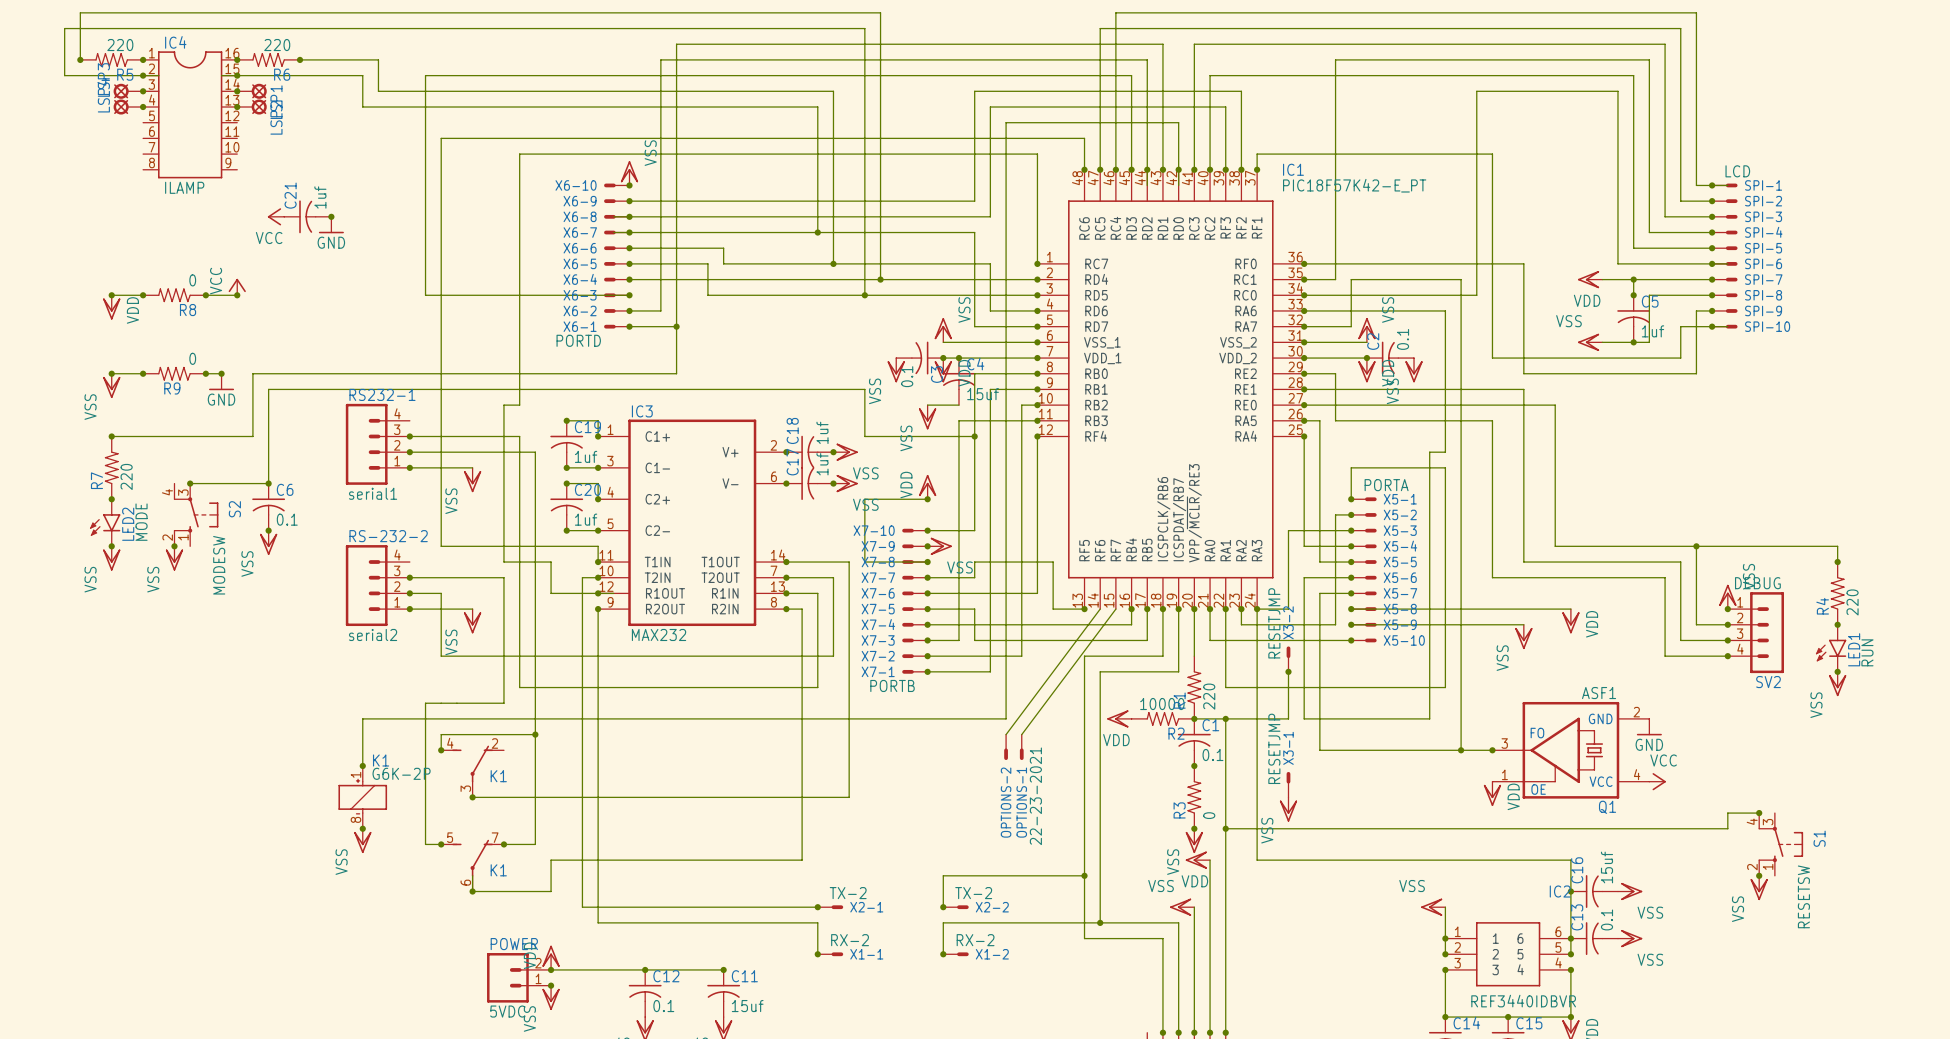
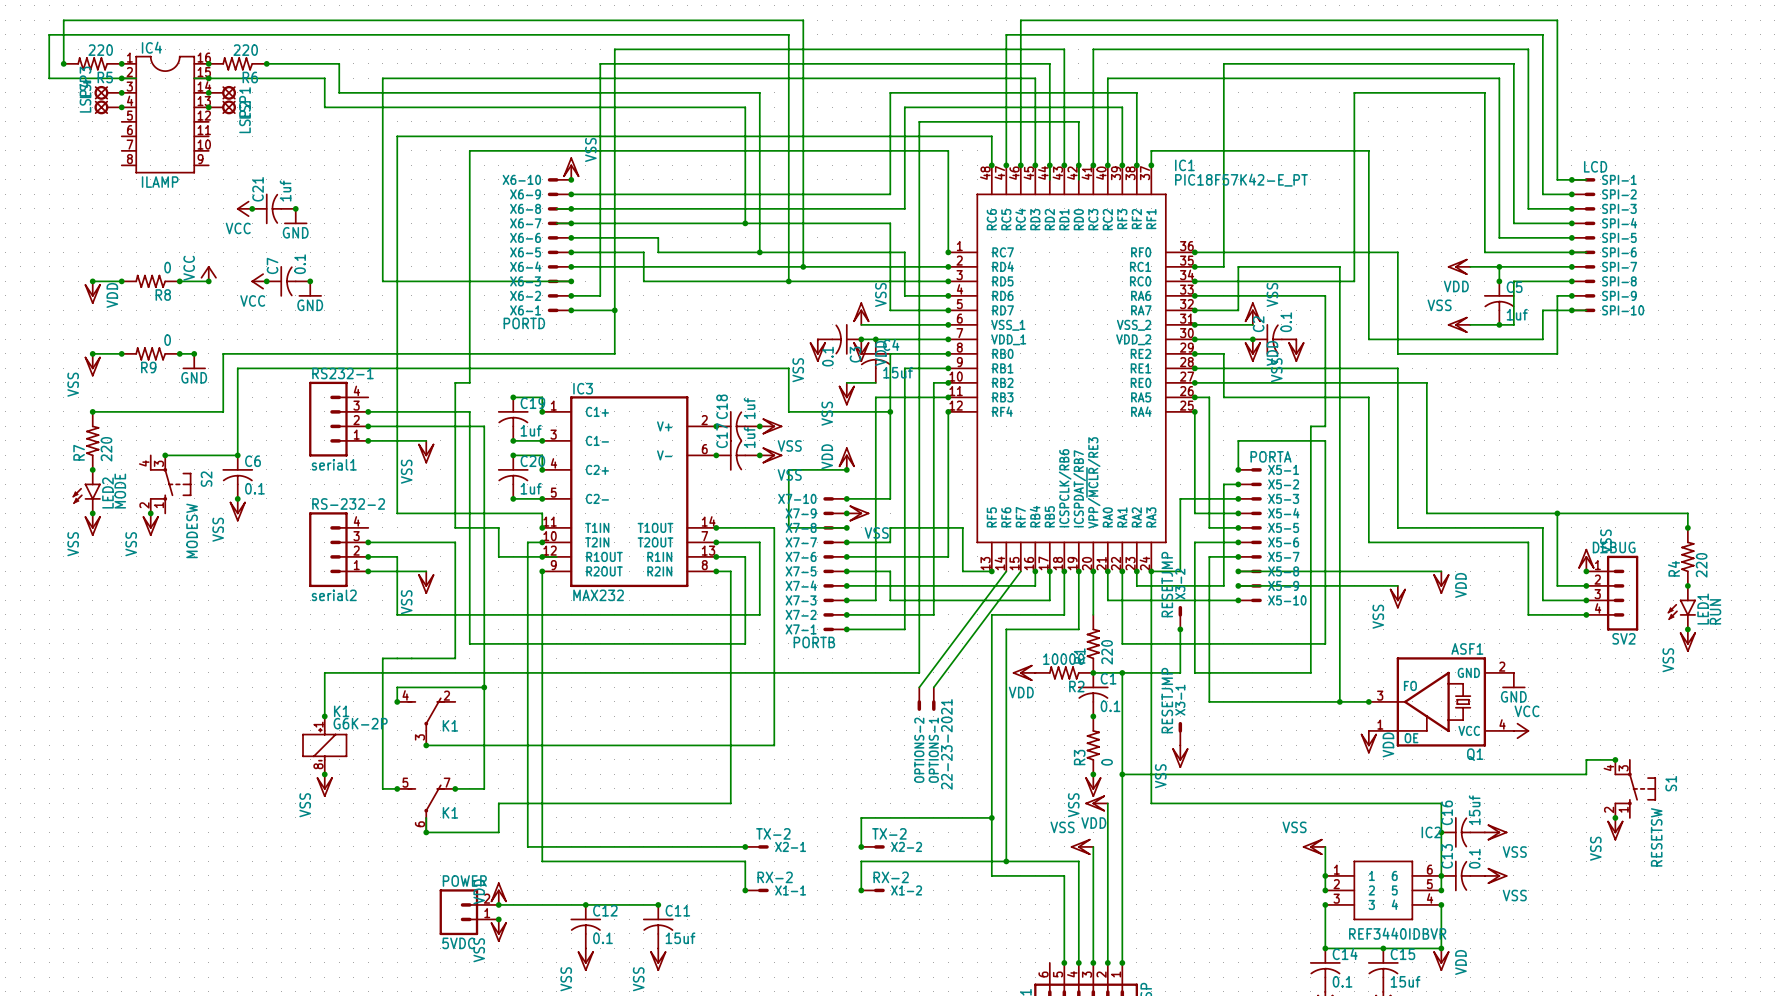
junction: none -> (252, 208)
power symbol: none -> VCC (259, 281)
junction: none -> (266, 281)
C7: none -> 0.1 (288, 281)
junction: none -> (310, 281)
power symbol: none -> GND (310, 289)

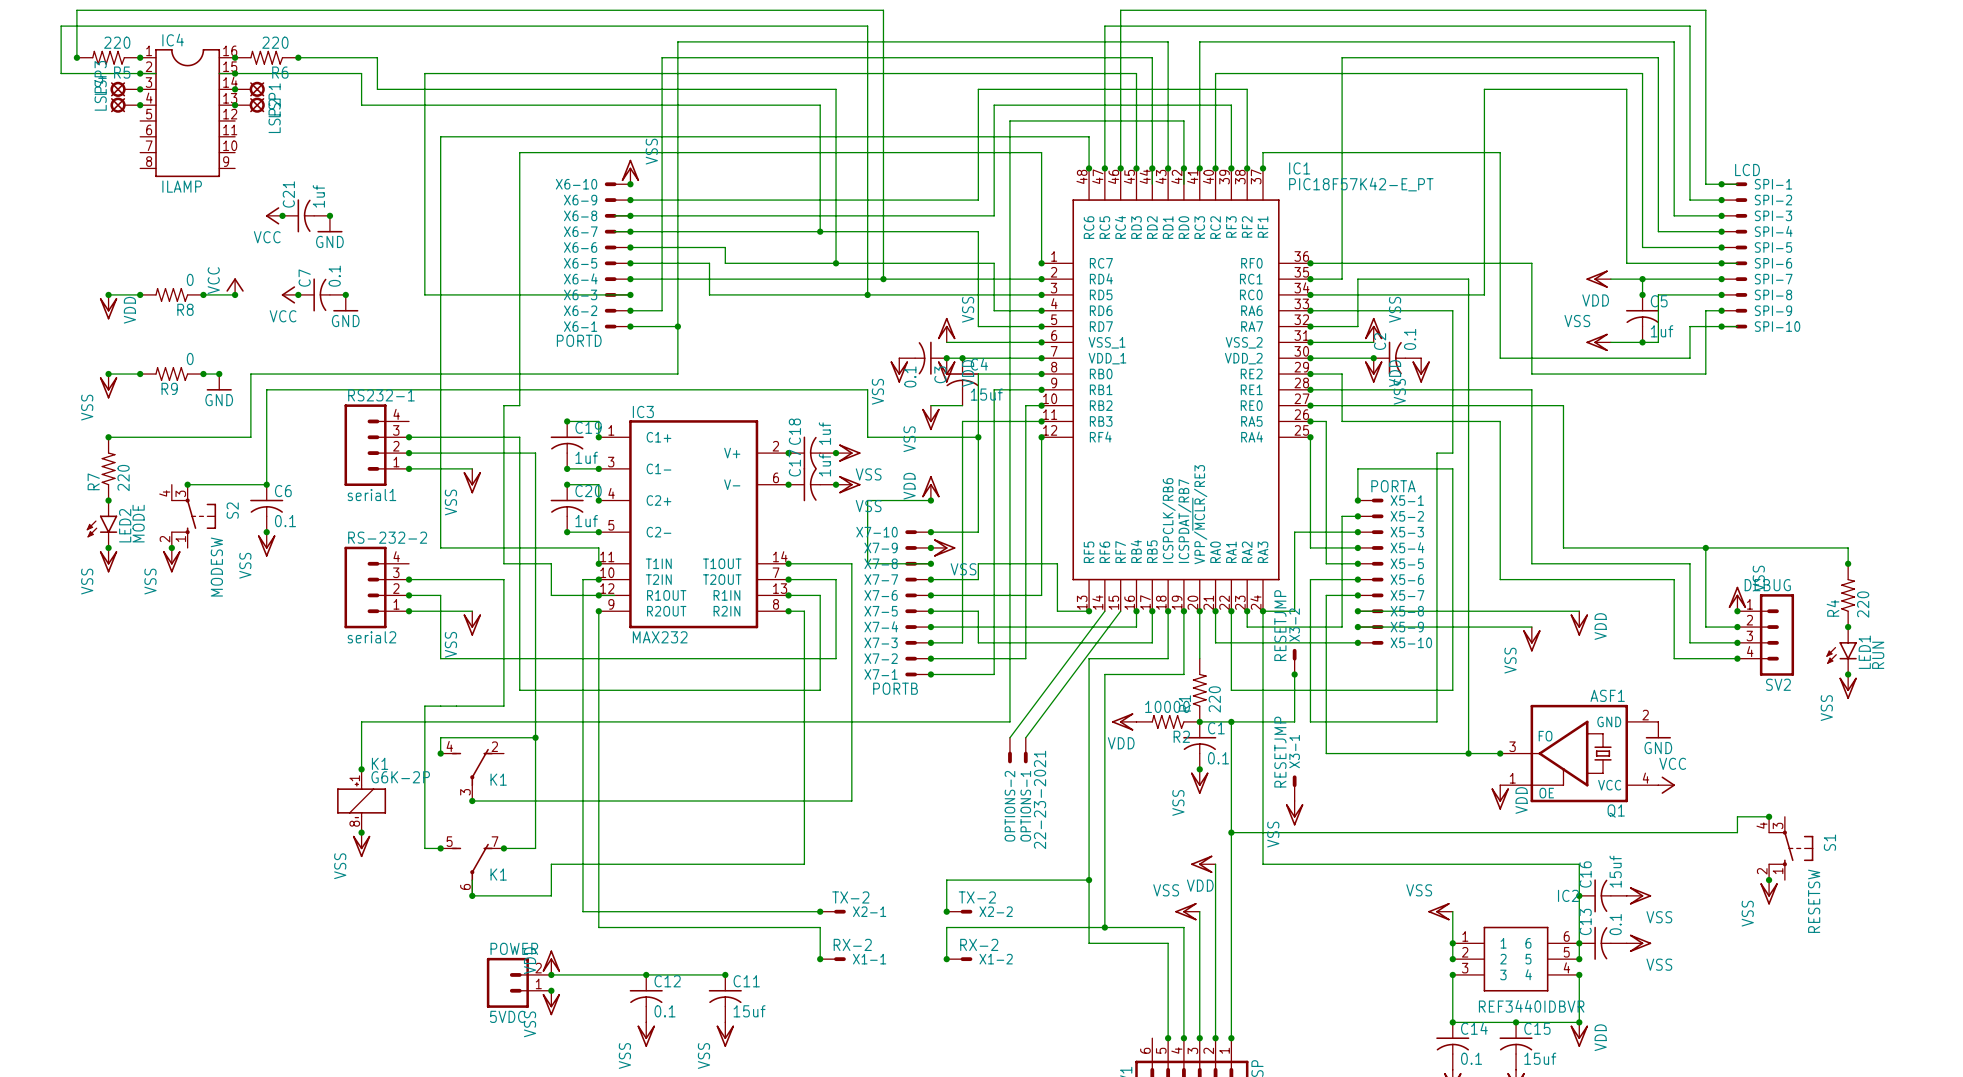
R3: 0 (1093, 745) -> none
junction: (1093, 774) -> none
power symbol position: VSS (1093, 785) -> VSS (1199, 781)

